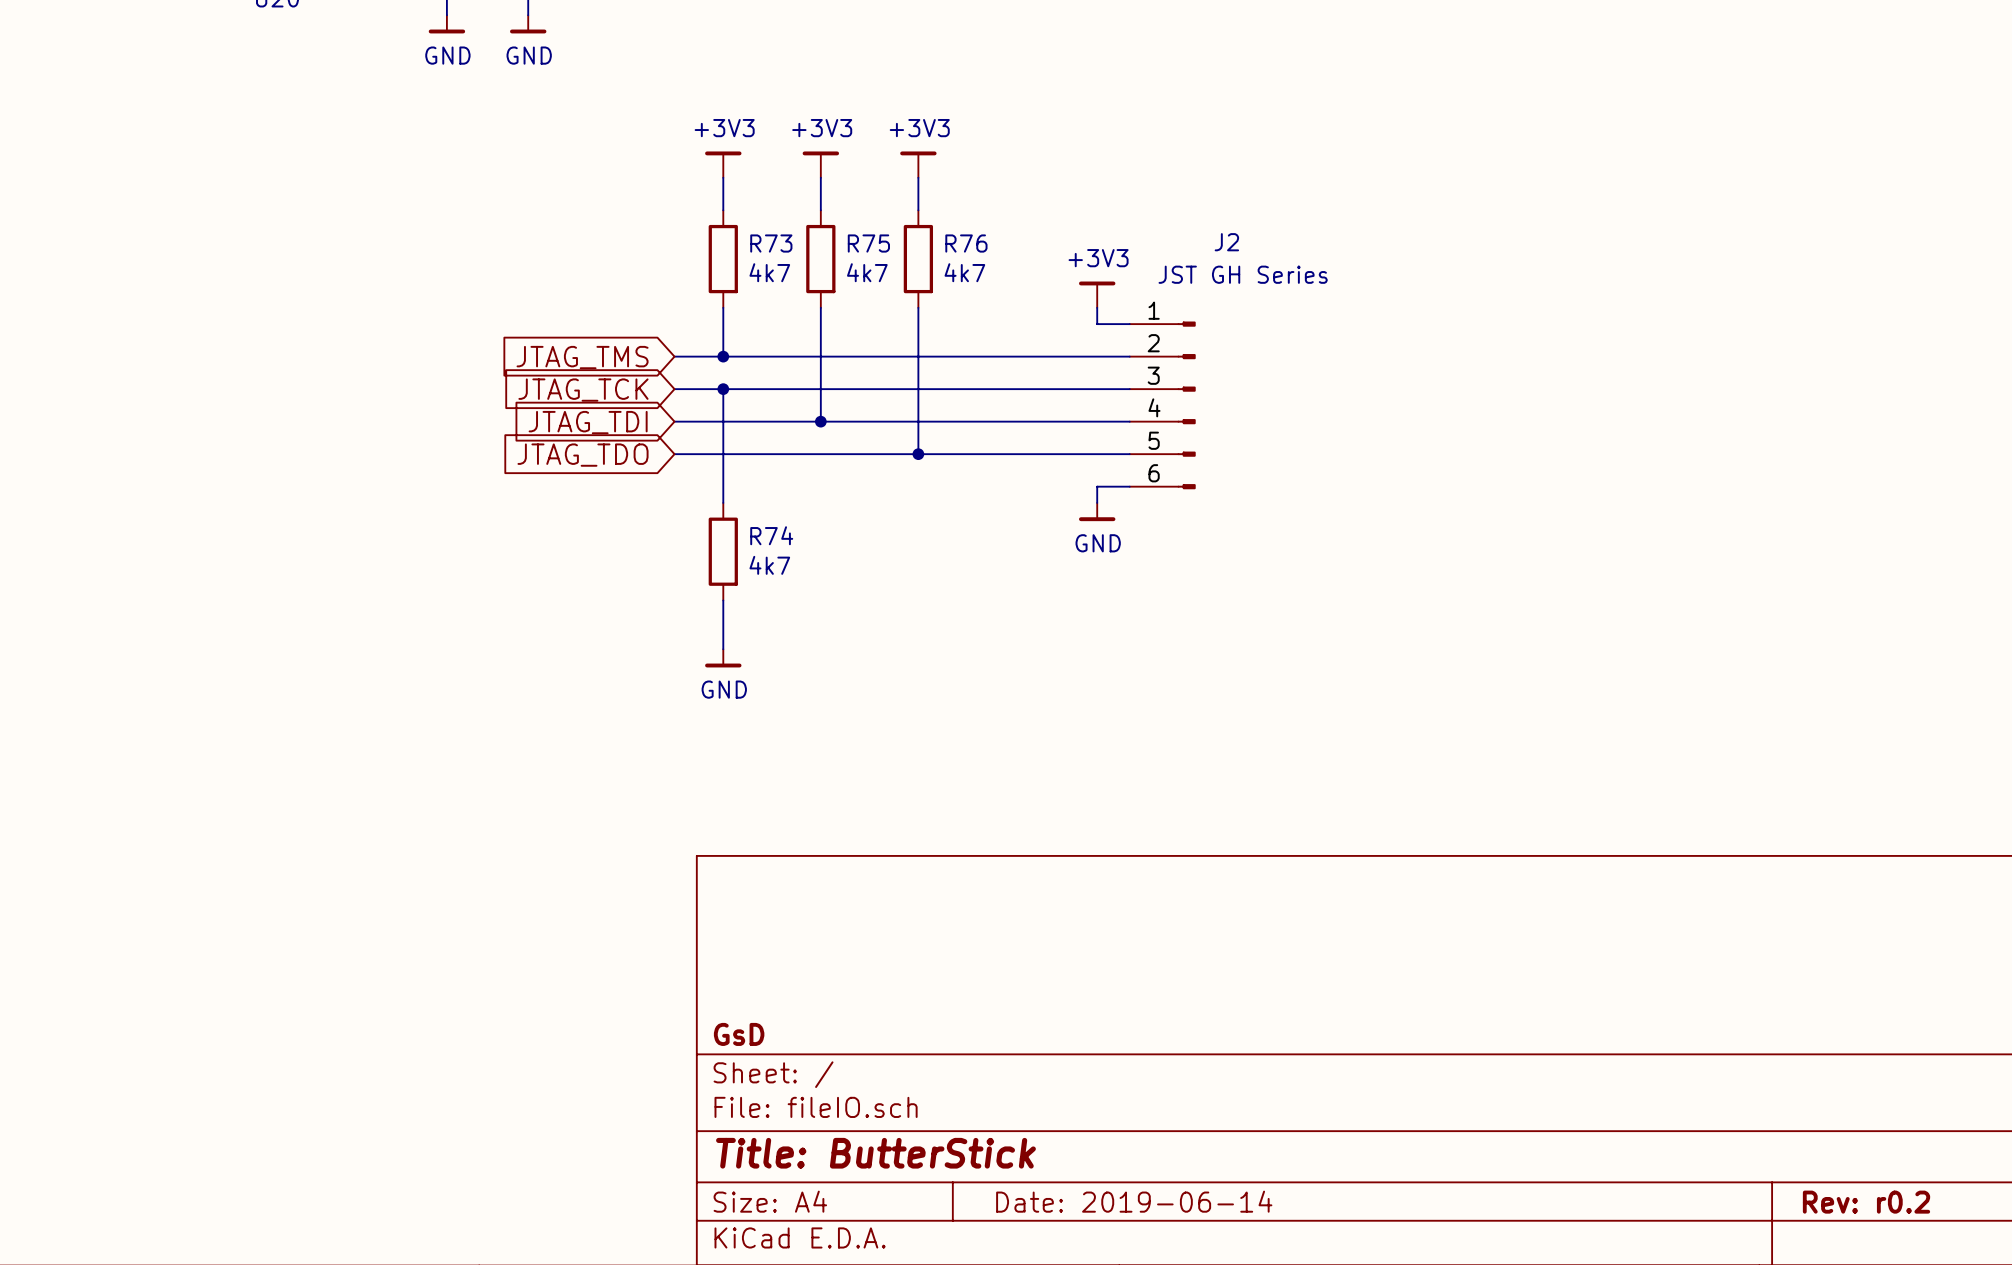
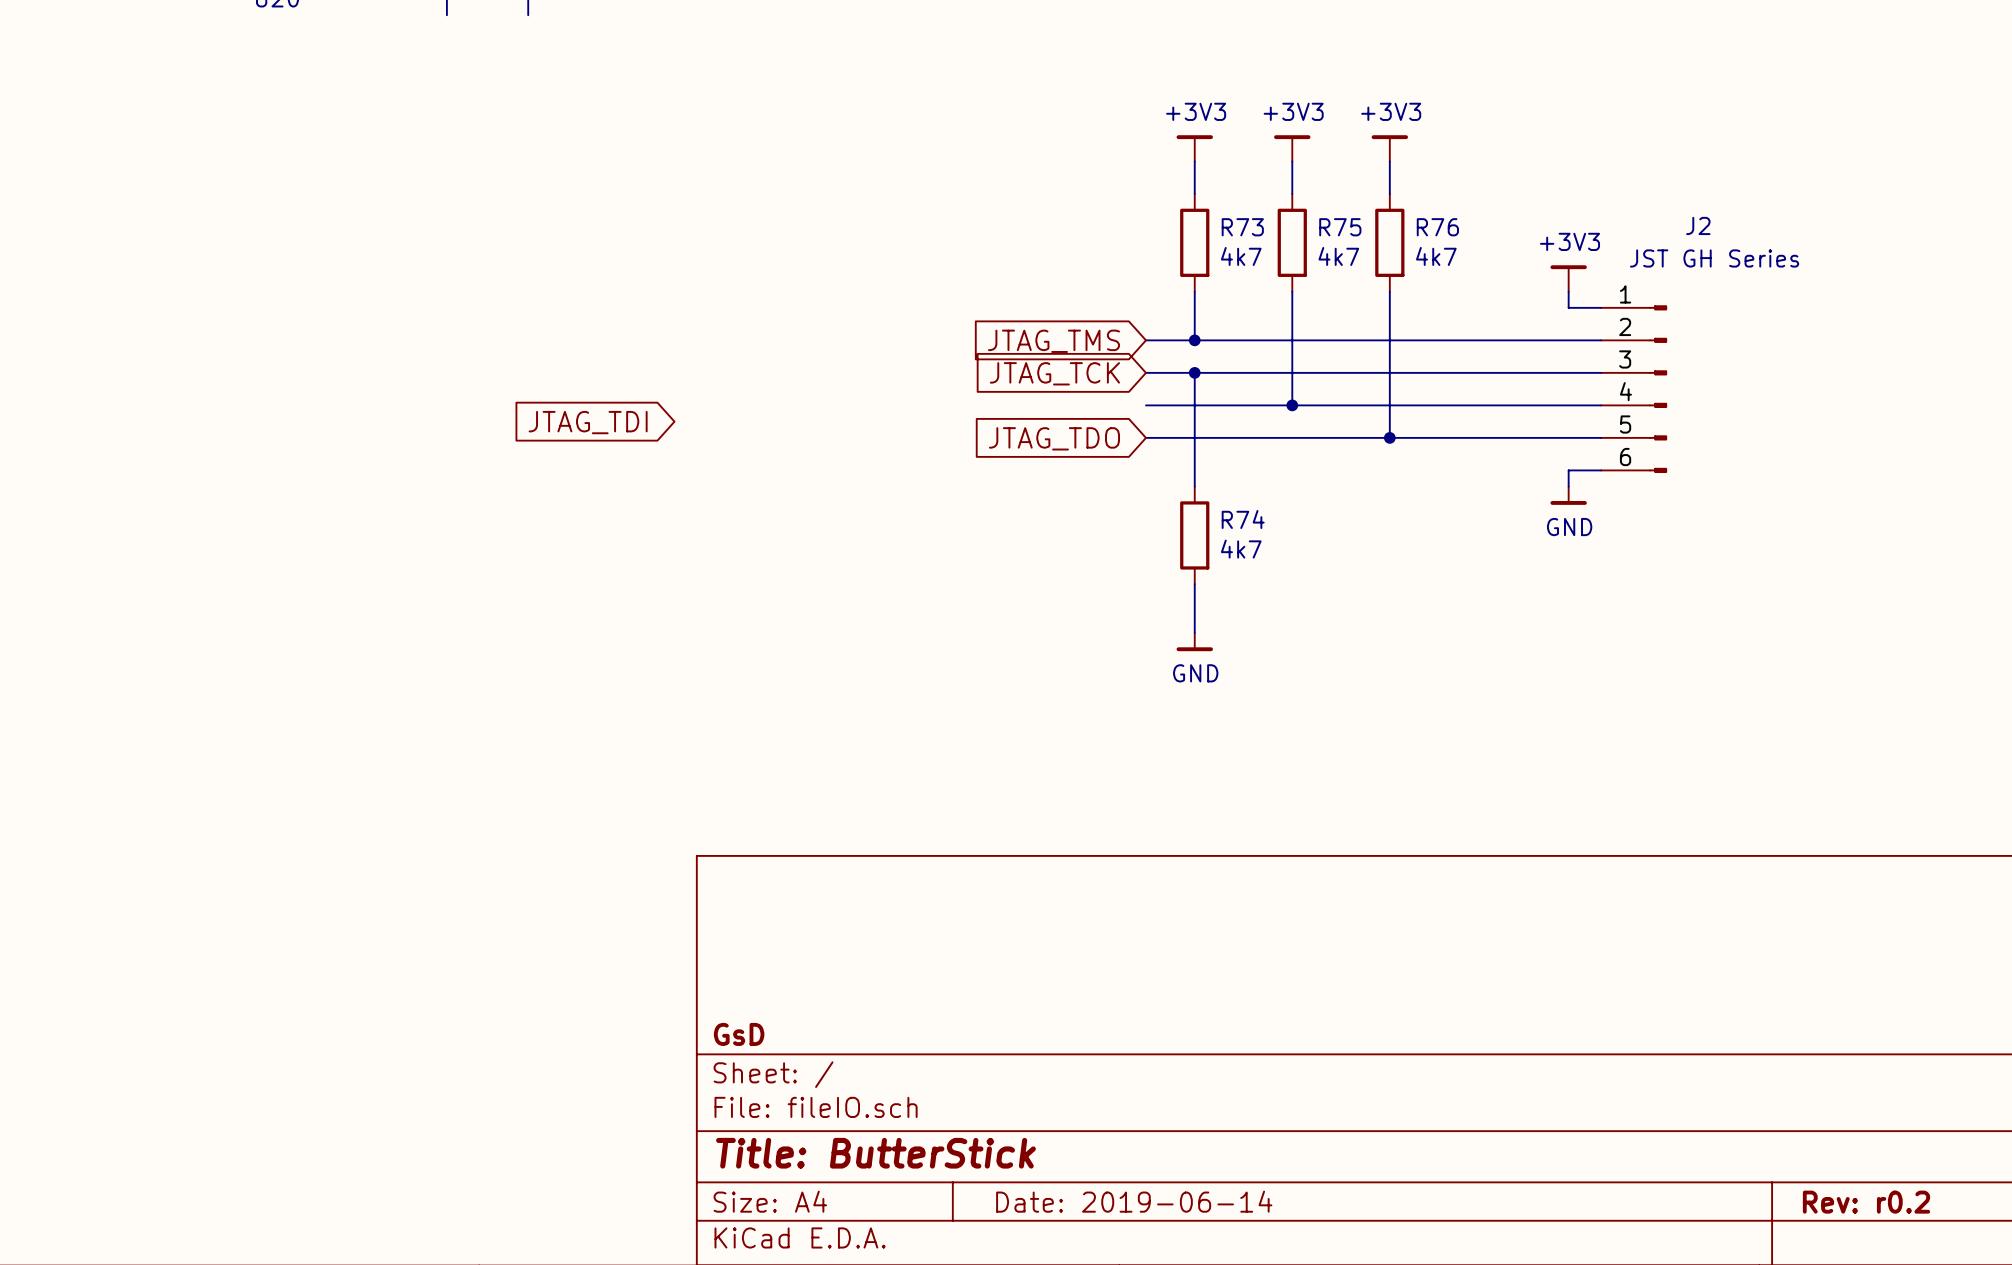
power symbol: GND (446, 24) -> none
power symbol: GND (528, 24) -> none
power symbol: none -> +3V3 (1194, 148)
power symbol: none -> +3V3 (1292, 148)
power symbol: none -> +3V3 (1389, 148)
wire: none -> (1292, 161) (1292, 194)
wire: none -> (1389, 161) (1389, 194)
power symbol: +3V3 (723, 164) -> none
power symbol: +3V3 (820, 164) -> none
power symbol: +3V3 (918, 164) -> none
wire: (723, 177) (723, 210) -> none
wire: (820, 177) (820, 210) -> none
wire: (918, 177) (918, 210) -> (1194, 161) (1194, 194)
R73 position: (723, 259) -> (1194, 242)
R75 position: (820, 259) -> (1292, 242)
R76 position: (918, 259) -> (1389, 242)
power symbol: none -> +3V3 (1568, 278)
wire: none -> (1194, 291) (1194, 340)
wire: none -> (1292, 291) (1292, 405)
wire: none -> (1389, 291) (1389, 437)
wire: none -> (1568, 291) (1568, 307) (1601, 307)
power symbol: +3V3 (1097, 294) -> none
wire: (723, 307) (723, 356) -> none
wire: (820, 307) (820, 421) -> none
wire: (918, 307) (918, 454) -> none
wire: (1097, 307) (1097, 324) (1129, 324) -> none
wire: none -> (1145, 340) (1601, 340)
junction: none -> (1194, 340)
global label: none -> JTAG_TMS (1054, 341)
wire: (674, 356) (1129, 356) -> none
junction: (723, 356) -> none
global label: JTAG_TMS (582, 357) -> none
wire: none -> (1145, 372) (1601, 372)
wire: none -> (1194, 372) (1194, 486)
junction: none -> (1194, 372)
global label: none -> JTAG_TCK (1054, 373)
wire: (674, 389) (1129, 389) -> none
wire: (723, 389) (723, 502) -> none
junction: (723, 389) -> none
global label: JTAG_TCK (583, 390) -> none
wire: none -> (1145, 405) (1601, 405)
J2 position: (1162, 405) -> (1634, 389)
junction: none -> (1292, 405)
wire: (674, 421) (1129, 421) -> none
junction: (820, 421) -> none
wire: none -> (1145, 437) (1601, 437)
junction: none -> (1389, 437)
global label: none -> JTAG_TDO (1054, 438)
wire: (674, 454) (1129, 454) -> none
junction: (918, 454) -> none
global label: JTAG_TDO (583, 455) -> none
wire: none -> (1601, 470) (1568, 470) (1568, 486)
wire: (1129, 486) (1097, 486) (1097, 502) -> none
power symbol: none -> GND (1568, 495)
power symbol position: GND (1097, 512) -> GND (1194, 642)
R74 position: (723, 551) -> (1194, 535)
wire: none -> (1194, 584) (1194, 632)
wire: (723, 600) (723, 649) -> none
power symbol: GND (723, 658) -> none

